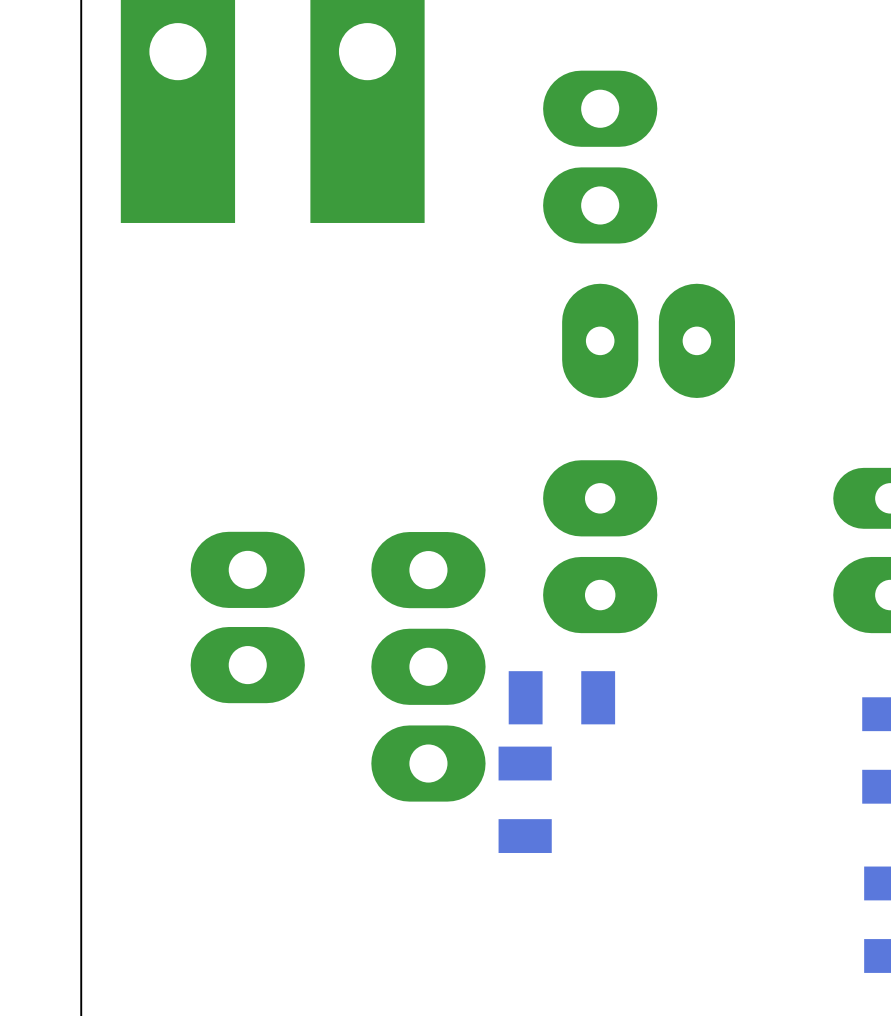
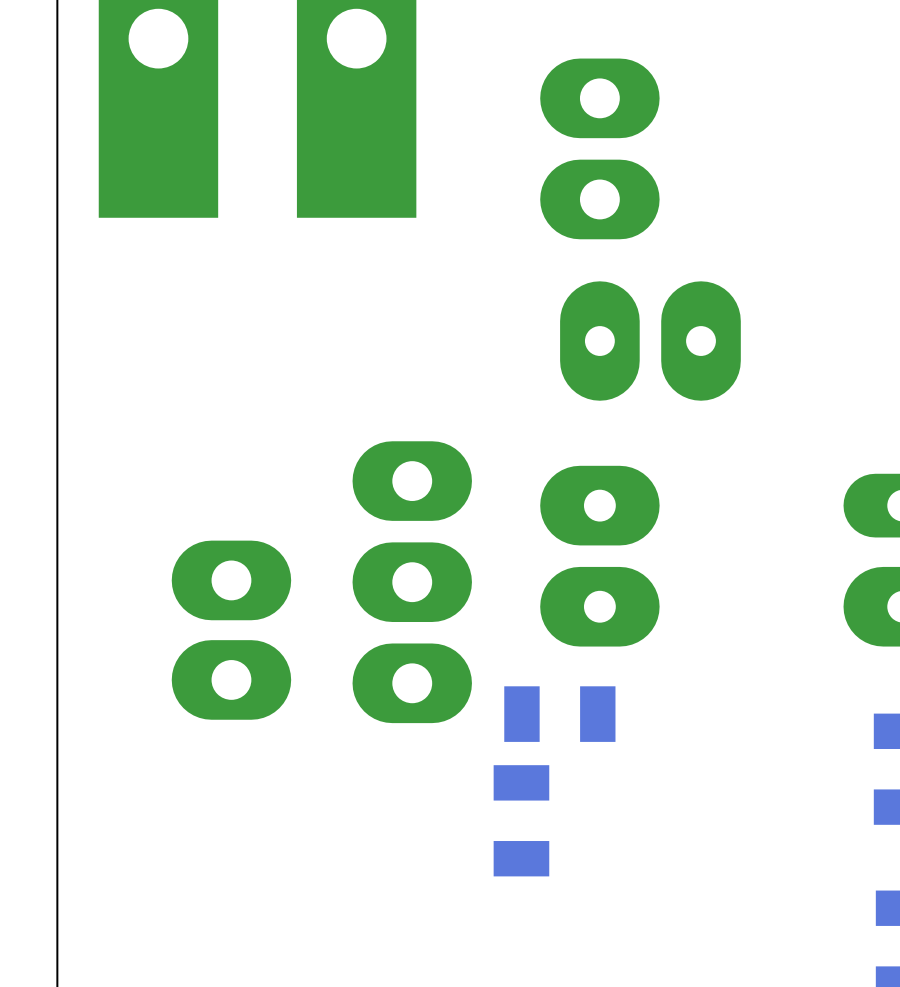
part position: (428, 666) -> (412, 582)

